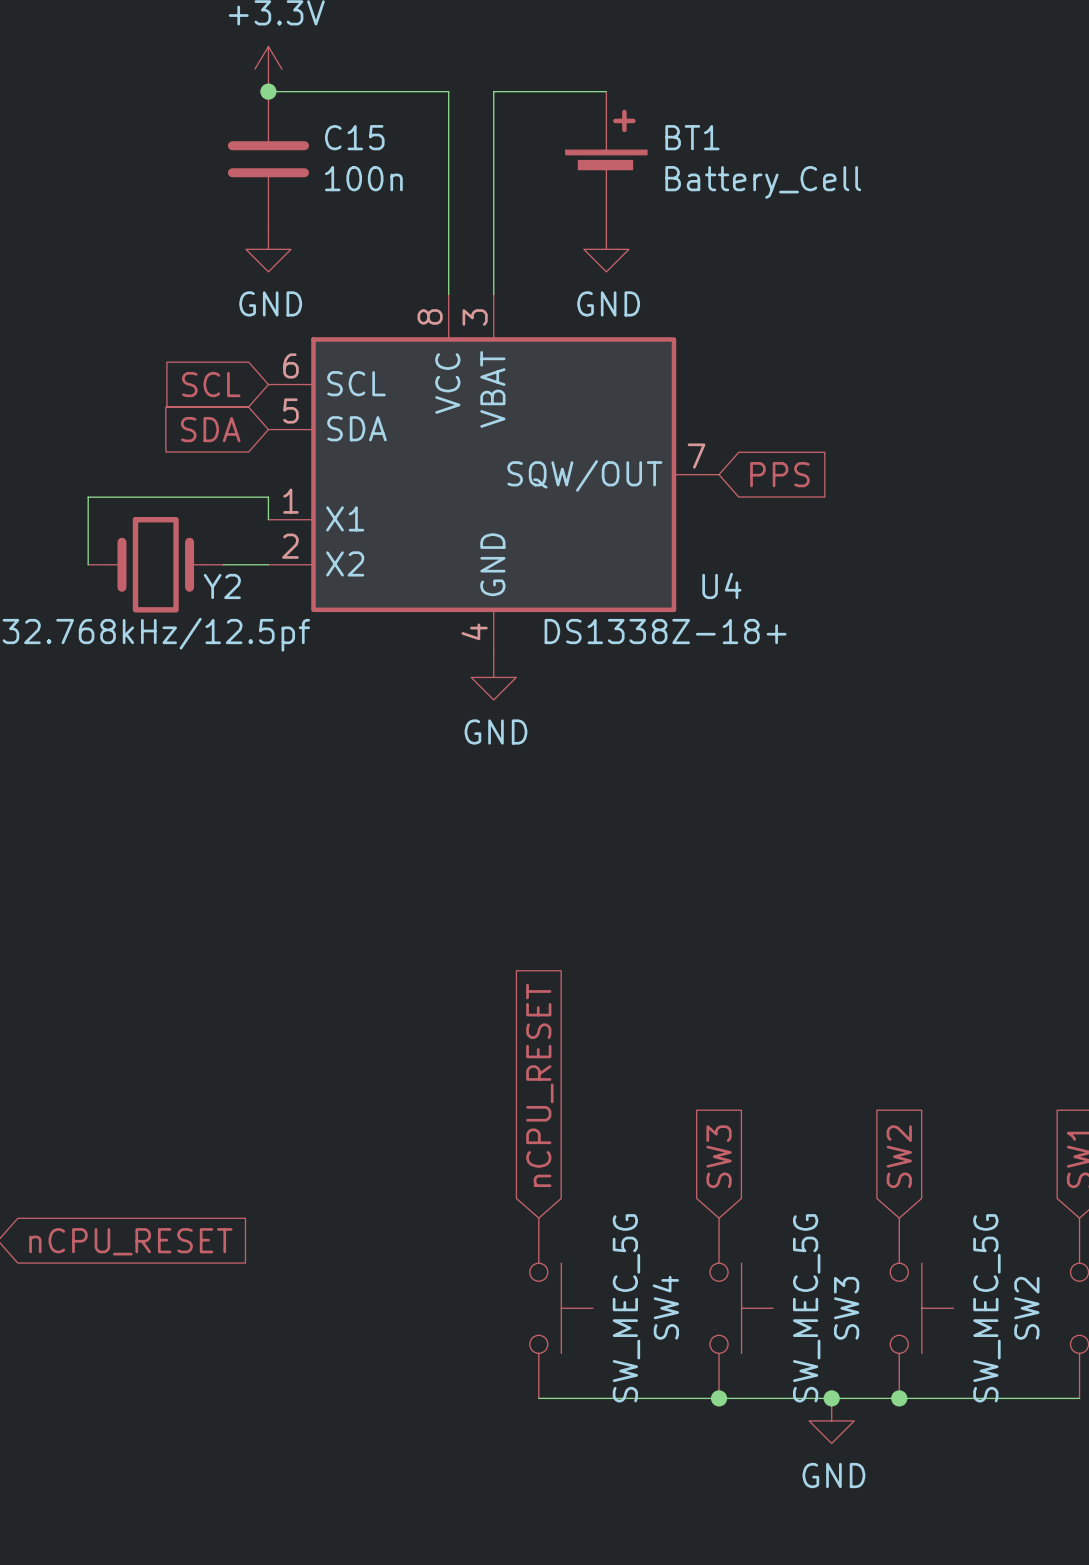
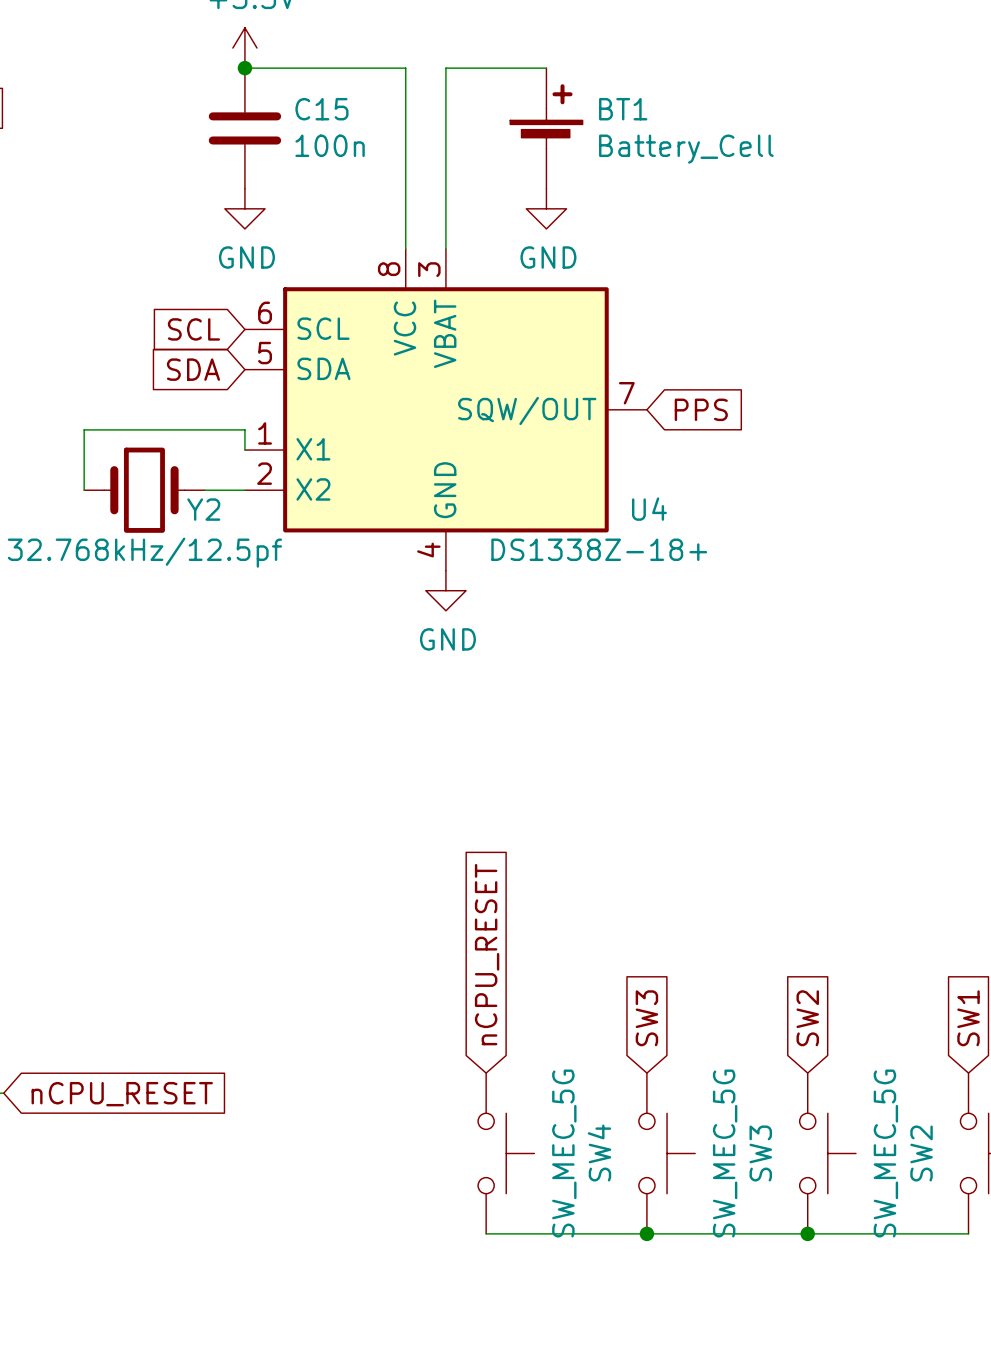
junction: (831, 1398) -> none
power symbol: GND (831, 1420) -> none

